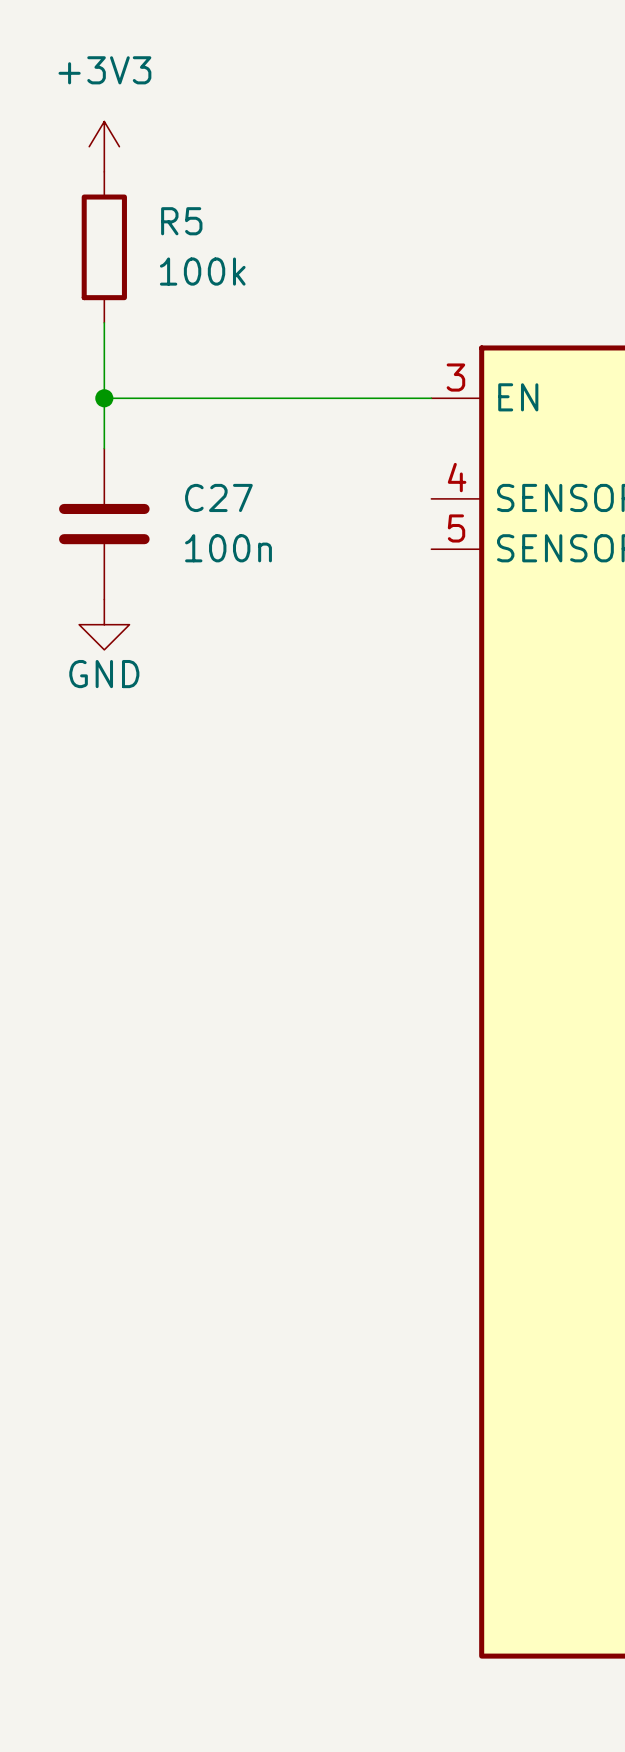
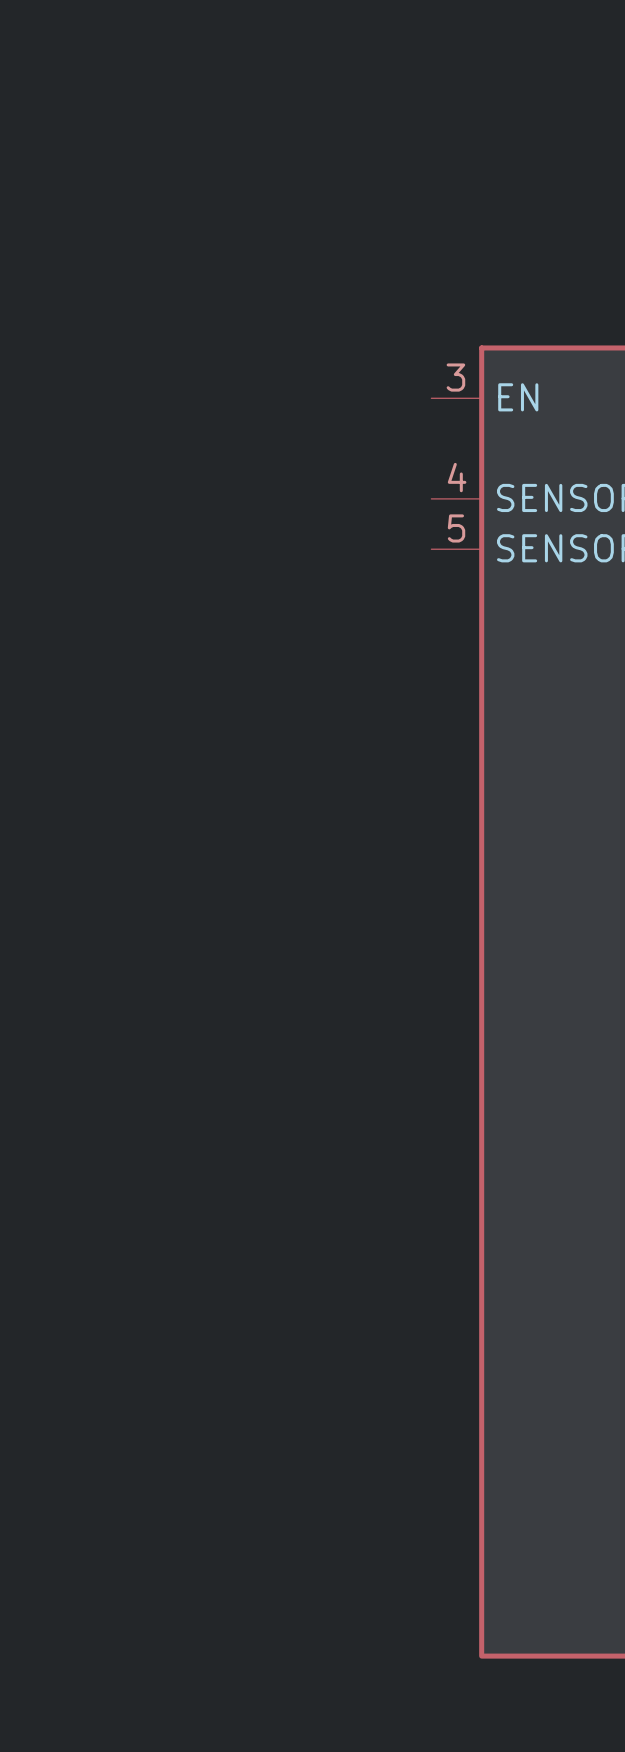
power symbol: +3V3 (104, 146) -> none
R5: 100k (104, 247) -> none
wire: (104, 322) (104, 448) -> none
wire: (104, 398) (431, 398) -> none
junction: (104, 398) -> none
C27: 100n (104, 524) -> none
power symbol: GND (104, 624) -> none

